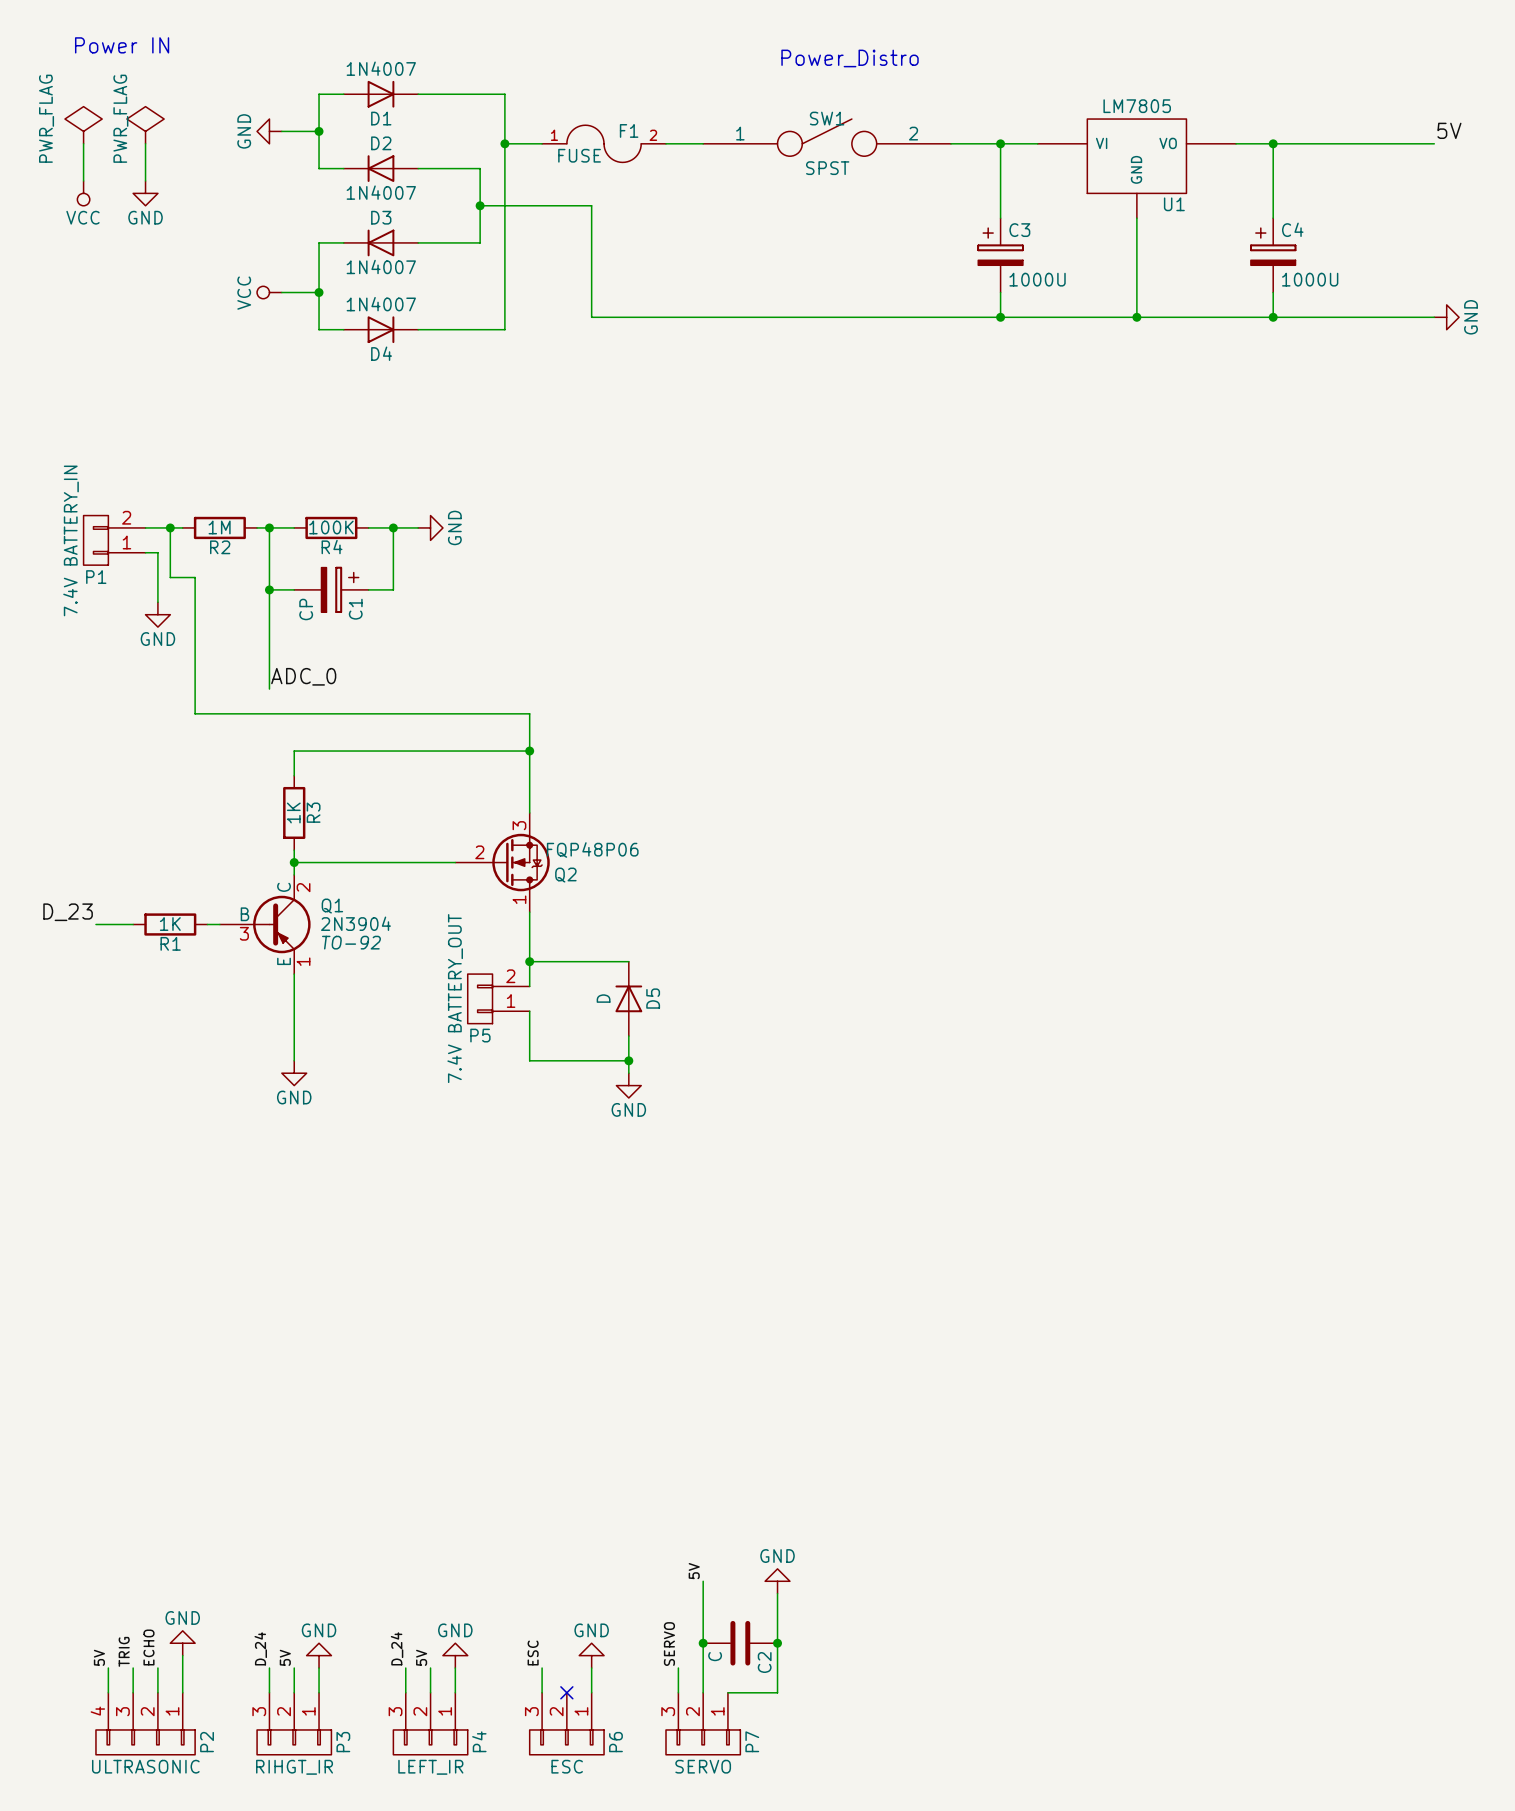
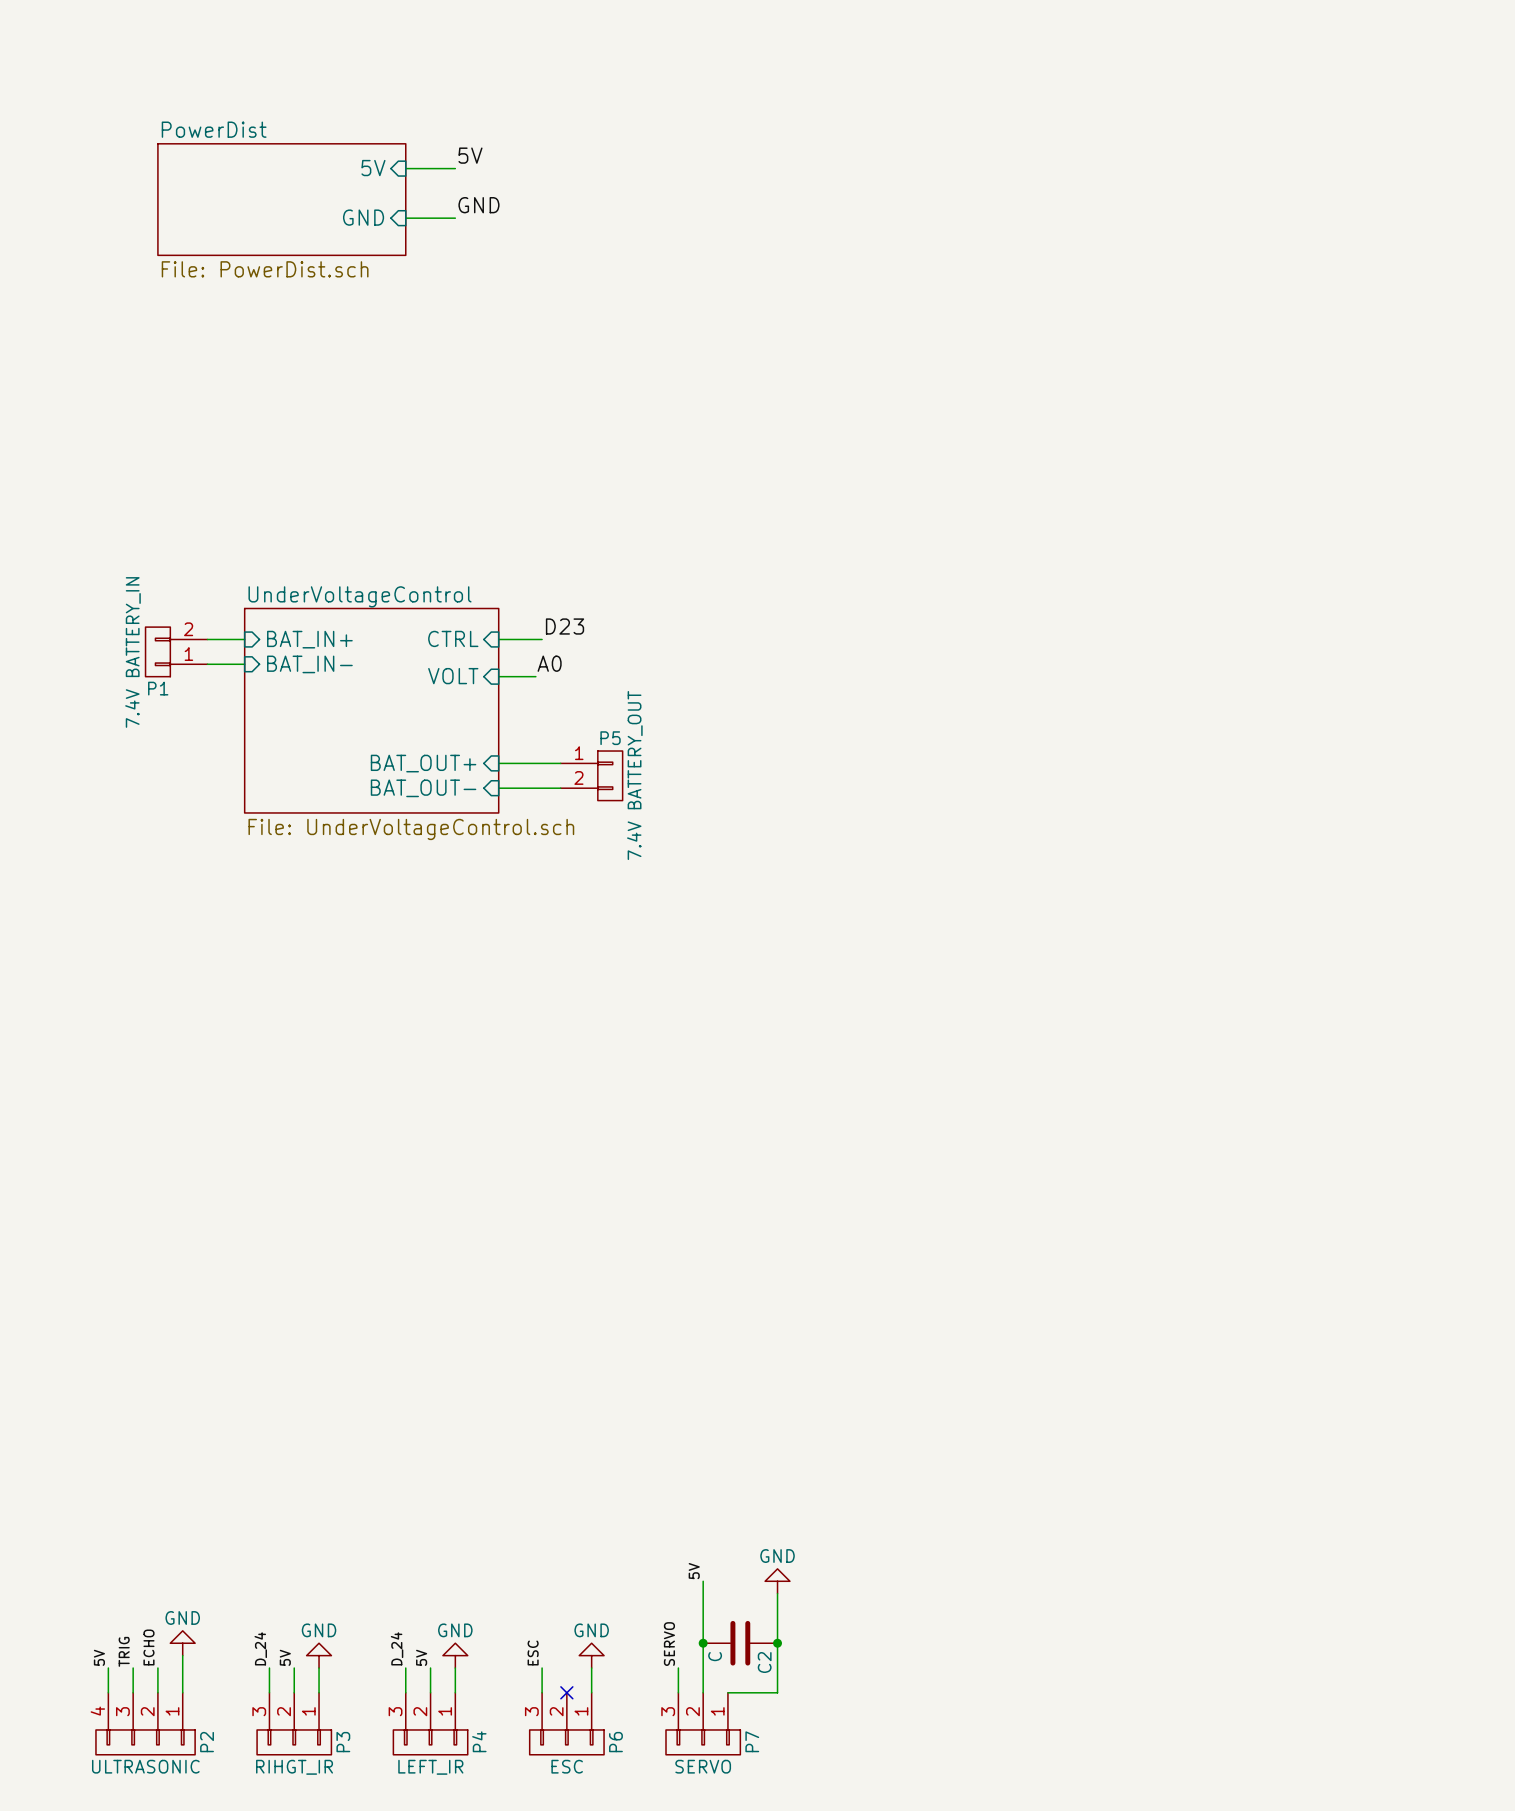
text: Power IN (122, 45) -> none
text: Power_Distro (850, 58) -> none
wire: (343, 94) (319, 94) (319, 168) (343, 168) -> none
D1: 1N4007 (380, 94) -> none
wire: (418, 94) (504, 94) (504, 329) (418, 329) -> none
power symbol: PWR_FLAG (83, 125) -> none
power symbol: PWR_FLAG (145, 125) -> none
label: 5V (1449, 130) -> none
power symbol: GND (269, 131) -> none
wire: (281, 131) (319, 131) -> none
junction: (319, 131) -> none
SW1: SPST (827, 137) -> none
wire: (83, 143) (83, 180) -> none
wire: (145, 143) (145, 180) -> none
wire: (504, 143) (542, 143) -> none
junction: (504, 143) -> none
F1: FUSE (604, 143) -> none
wire: (666, 143) (703, 143) -> none
wire: (951, 143) (1037, 143) -> none
wire: (1000, 143) (1000, 218) -> none
junction: (1000, 143) -> none
wire: (1236, 143) (1434, 143) -> none
wire: (1273, 143) (1273, 218) -> none
junction: (1273, 143) -> none
label: none -> 5V (470, 155)
sheet pin: none -> 5V (373, 168)
D2: 1N4007 (380, 168) -> none
wire: (455, 168) (480, 168) (480, 242) (418, 242) -> none
U1: LM7805 (1136, 168) -> none
power symbol: VCC (83, 193) -> none
power symbol: GND (145, 193) -> none
sheet PowerDist: none -> File: PowerDist.sch (281, 199)
label: none -> GND (478, 205)
wire: (480, 205) (591, 205) (591, 317) (1434, 317) -> none
junction: (480, 205) -> none
sheet pin: none -> GND (363, 217)
wire: none -> (405, 218) (455, 218)
wire: (1136, 218) (1136, 317) -> none
wire: (343, 242) (319, 242) (319, 329) (343, 329) -> none
D3: 1N4007 (380, 242) -> none
C3: 1000U (1000, 255) -> none
C4: 1000U (1273, 255) -> none
power symbol: VCC (269, 292) -> none
wire: (281, 292) (319, 292) -> none
junction: (319, 292) -> none
wire: (1000, 292) (1000, 317) -> none
wire: (1273, 292) (1273, 317) -> none
junction: (1000, 317) -> none
junction: (1136, 317) -> none
junction: (1273, 317) -> none
power symbol: GND (1446, 317) -> none
D4: 1N4007 (380, 329) -> none
wire: (145, 527) (182, 527) -> (207, 664) (244, 664)
wire: (170, 527) (170, 577) (195, 577) (195, 713) (529, 713) (529, 812) -> none
junction: (170, 527) -> none
R2: 1M (219, 527) -> none
wire: (257, 527) (294, 527) -> (207, 639) (244, 639)
wire: (269, 527) (269, 689) -> none
junction: (269, 527) -> none
R4: 100K (331, 527) -> none
wire: (368, 527) (418, 527) -> none
wire: (393, 527) (393, 589) (368, 589) -> none
junction: (393, 527) -> none
power symbol: GND (430, 527) -> none
P1 position: (114, 540) -> (176, 651)
wire: (145, 552) (157, 552) (157, 602) -> none
wire: (269, 589) (294, 589) -> none
junction: (269, 589) -> none
C1: CP (331, 589) -> none
power symbol: GND (157, 614) -> none
label: none -> D23 (565, 626)
sheet pin: none -> CTRL (453, 638)
sheet pin: none -> BAT_IN+ (309, 639)
wire: none -> (498, 639) (542, 639)
label: none -> A0 (549, 663)
sheet pin: none -> BAT_IN- (309, 664)
label: ADC_0 (303, 676) -> none
sheet pin: none -> VOLT (453, 676)
wire: none -> (498, 676) (535, 676)
sheet UnderVoltageControl: none -> File: UnderVoltageControl.sch (371, 710)
wire: (529, 751) (294, 751) (294, 775) -> none
junction: (529, 751) -> none
sheet pin: none -> BAT_OUT+ (423, 763)
wire: none -> (498, 763) (560, 763)
sheet pin: none -> BAT_OUT- (423, 788)
wire: none -> (498, 788) (560, 788)
R3: 1K (294, 812) -> none
wire: (294, 850) (294, 874) -> none
wire: (294, 862) (455, 862) -> none
junction: (294, 862) -> none
Q2: FQP48P06 (502, 862) -> none
label: D_23 (68, 912) -> none
wire: (529, 912) (529, 986) -> none
wire: (95, 924) (133, 924) -> none
R1: 1K (170, 924) -> none
wire: (207, 924) (219, 924) -> none
Q1: 2N3904 (265, 924) -> none
wire: (529, 961) (628, 961) -> none
junction: (529, 961) -> none
wire: (294, 974) (294, 1060) -> none
P5 rotation: 0° (480, 998) -> 180° (610, 775)
P5 position: (498, 998) -> (591, 775)
D5: D (628, 998) -> none
wire: (529, 1011) (529, 1060) (628, 1060) -> none
wire: (628, 1036) (628, 1073) -> none
junction: (628, 1060) -> none
power symbol: GND (294, 1073) -> none
power symbol: GND (628, 1085) -> none

